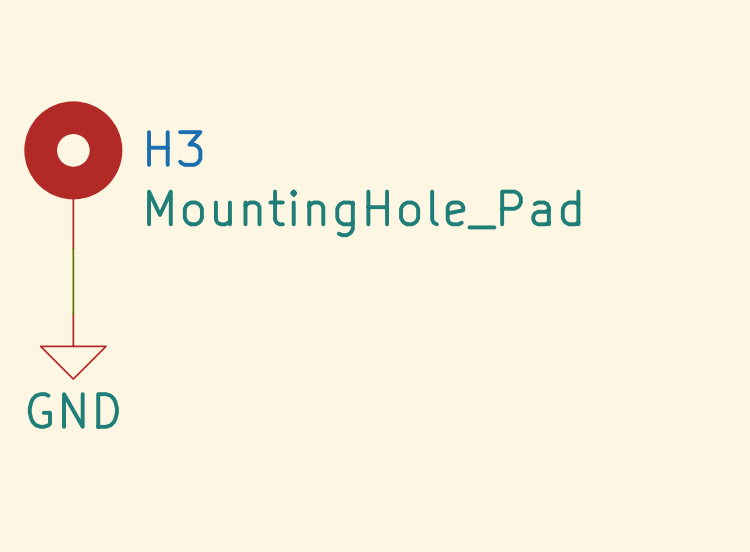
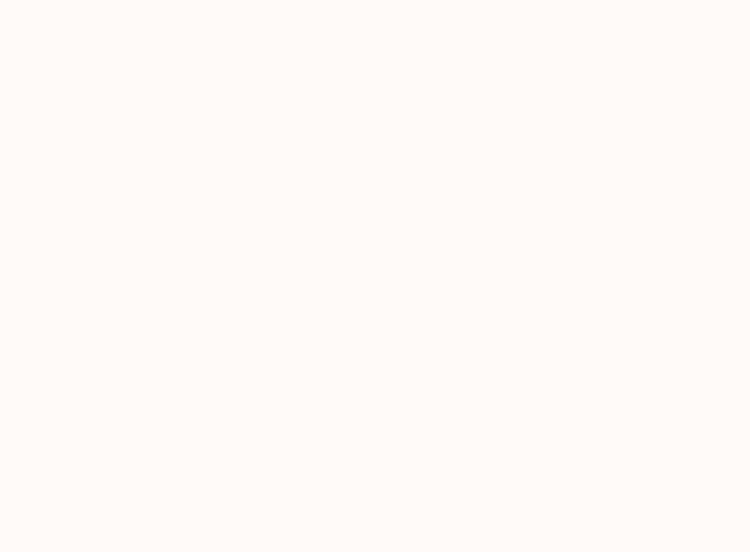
H3: MountingHole_Pad (73, 174) -> none
wire: (73, 248) (73, 313) -> none
power symbol: GND (73, 346) -> none

